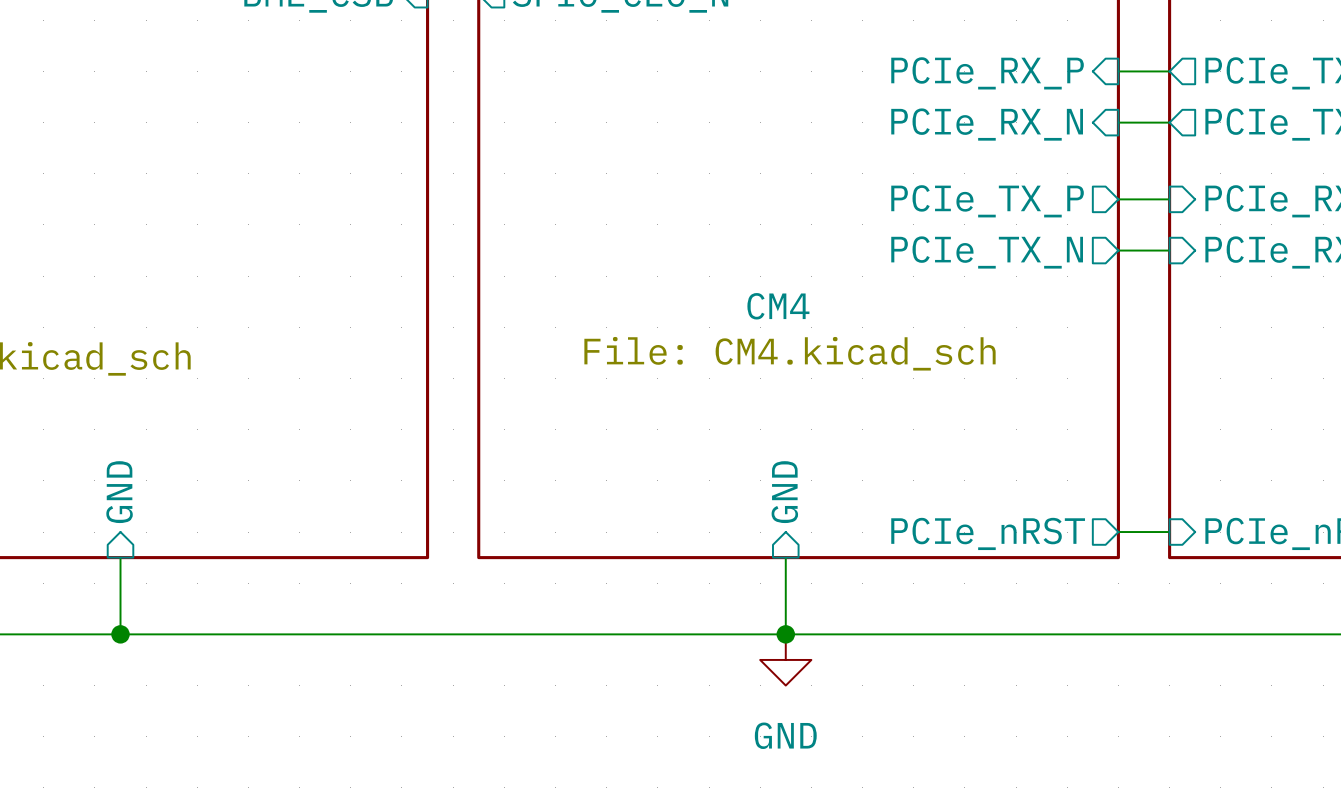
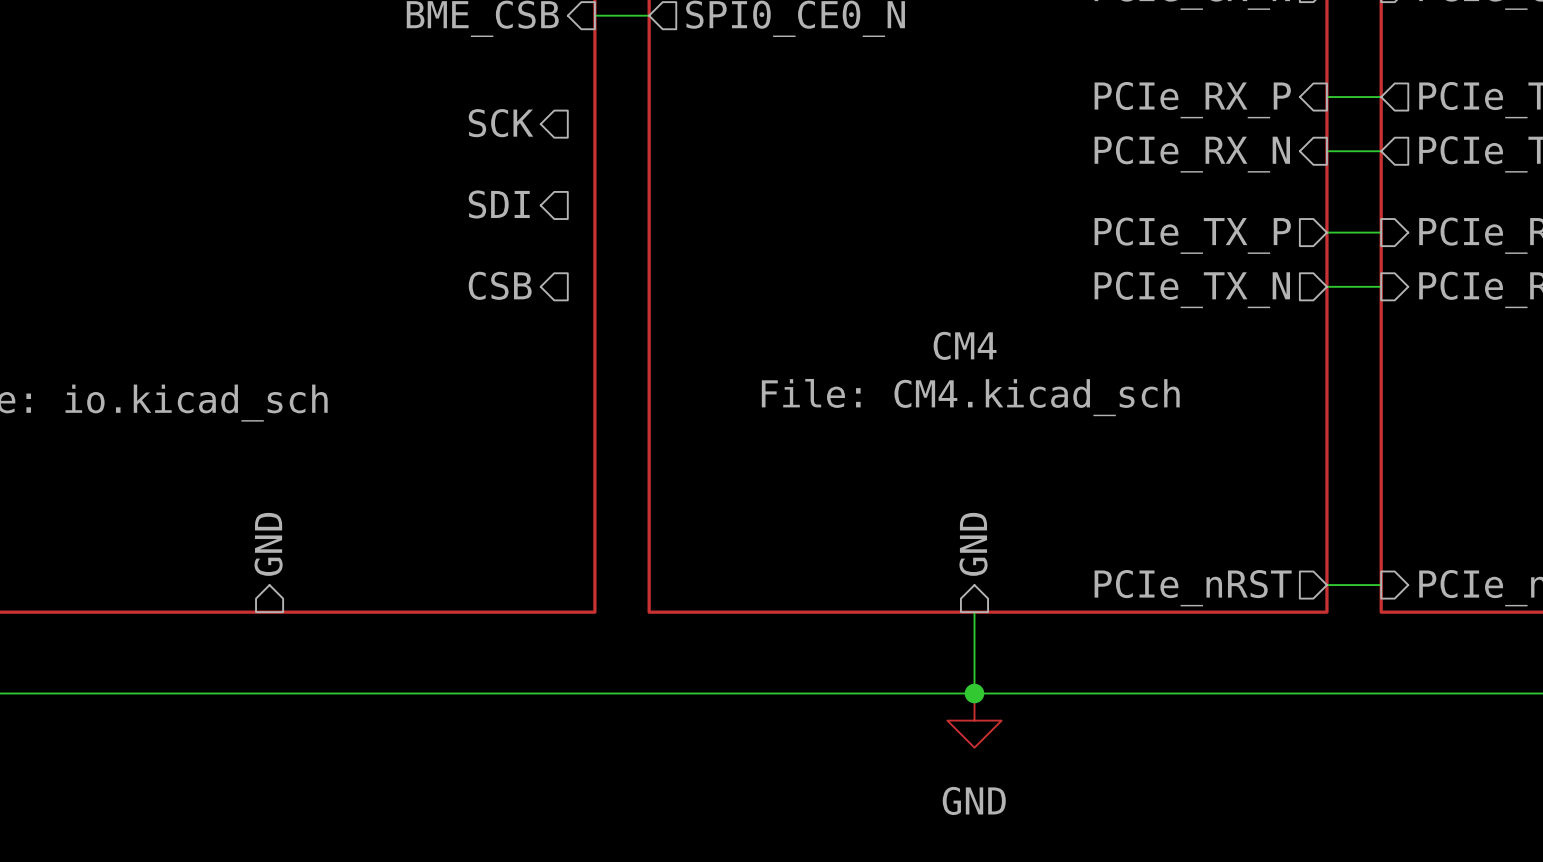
sheet pin: none -> SCK (500, 123)
sheet pin: none -> SDI (499, 204)
sheet pin: none -> CSB (500, 285)
wire: (120, 557) (120, 634) -> none
junction: (120, 634) -> none

